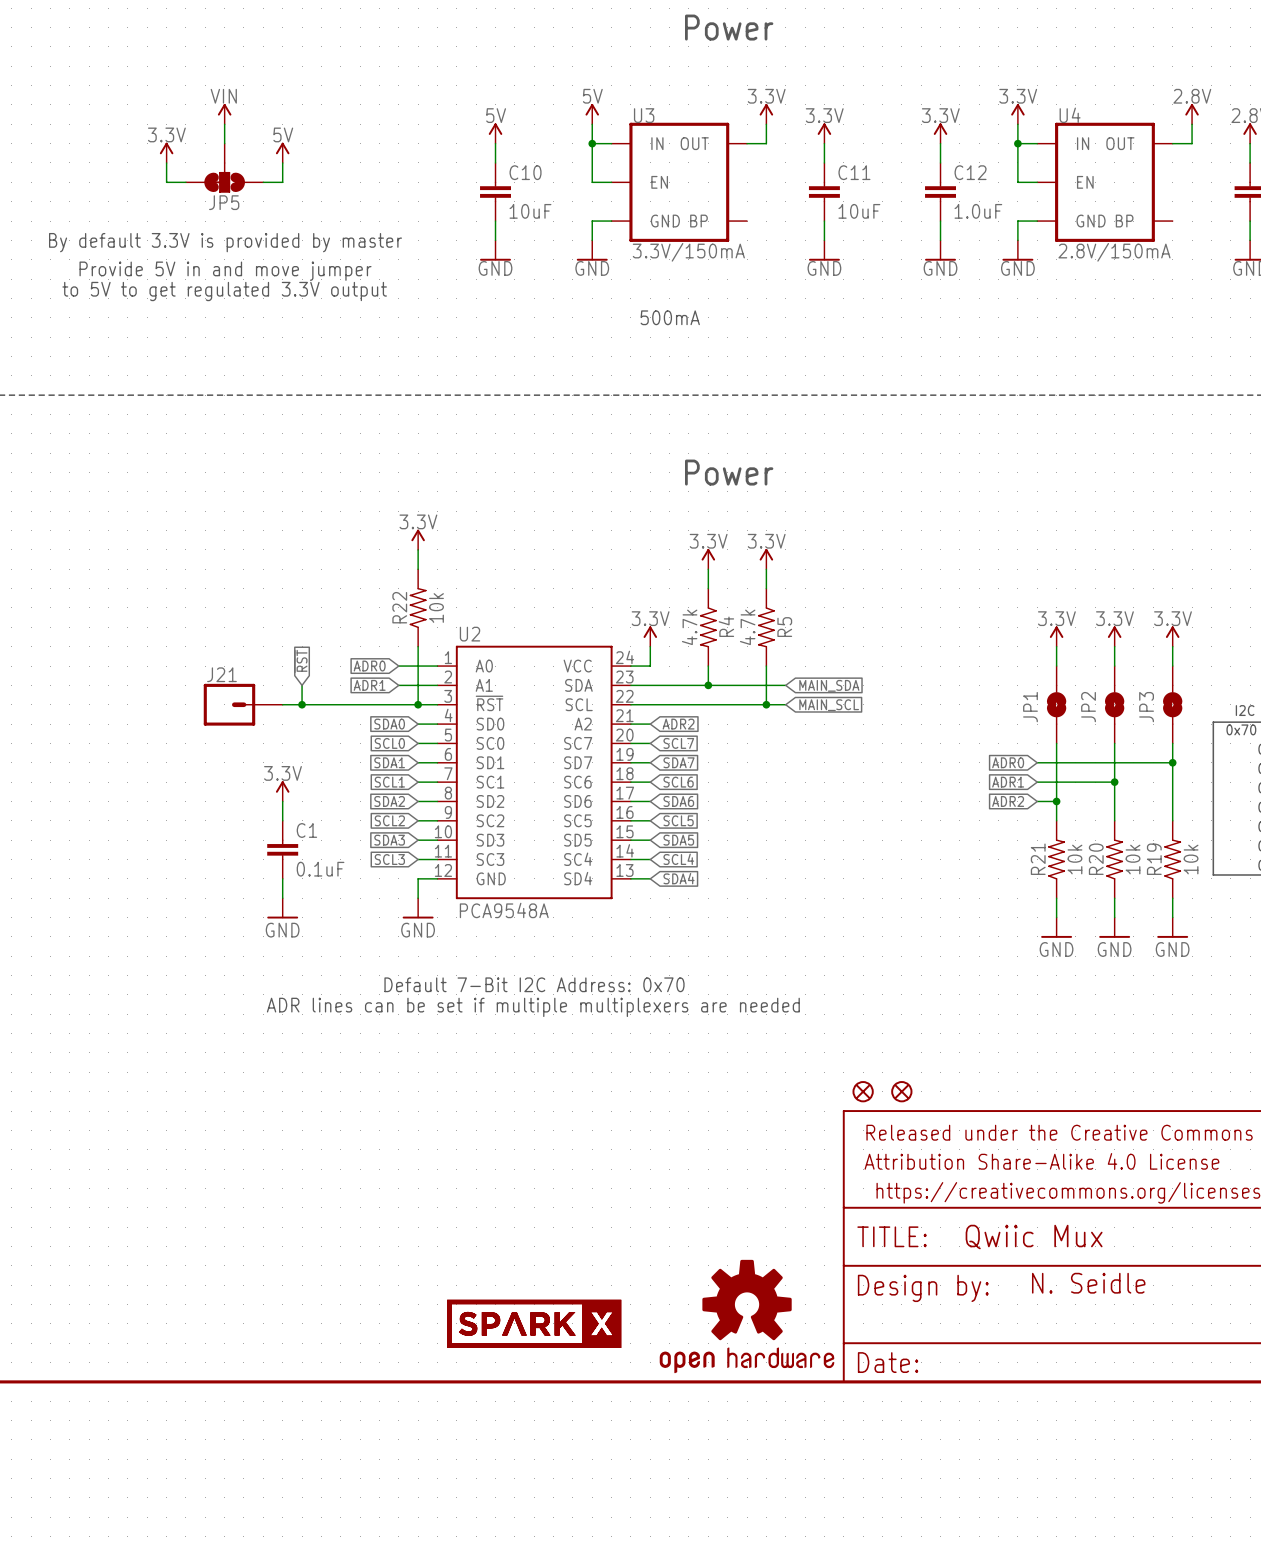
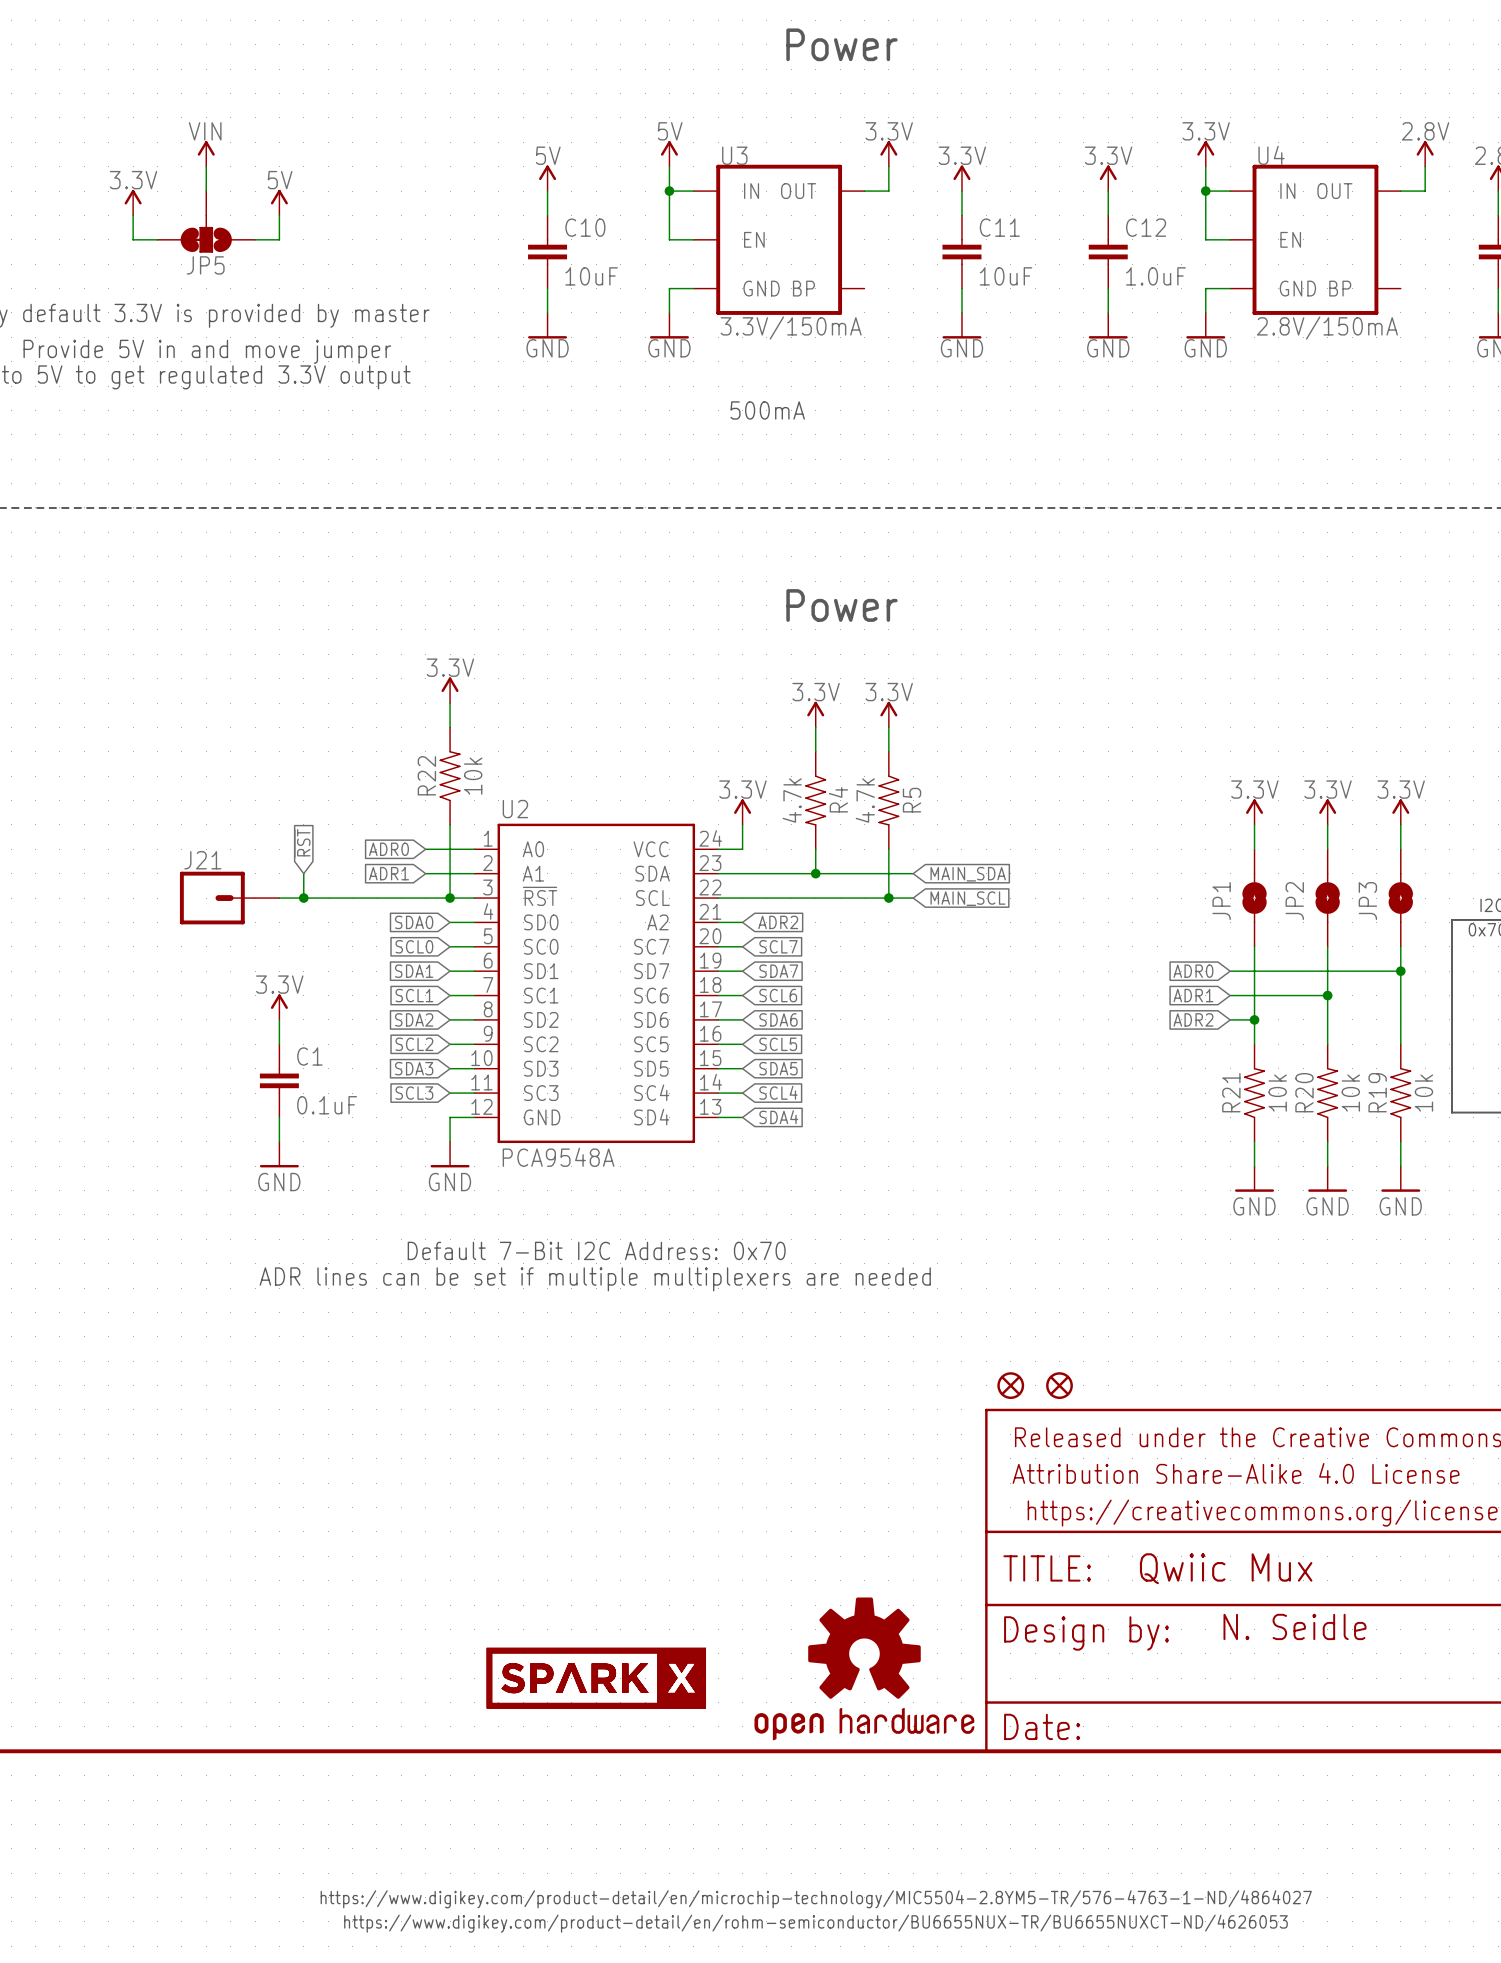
text: none -> https://www.digikey.com/product-detail/en/microchip-technology/MIC5504-2.8YM5-TR/576-4763-1-ND/4864027 (816, 1899)
text: none -> https://www.digikey.com/product-detail/en/rohm-semiconductor/BU6655NUX-TR/BU6655NUXCT-ND/4626053 (815, 1923)

